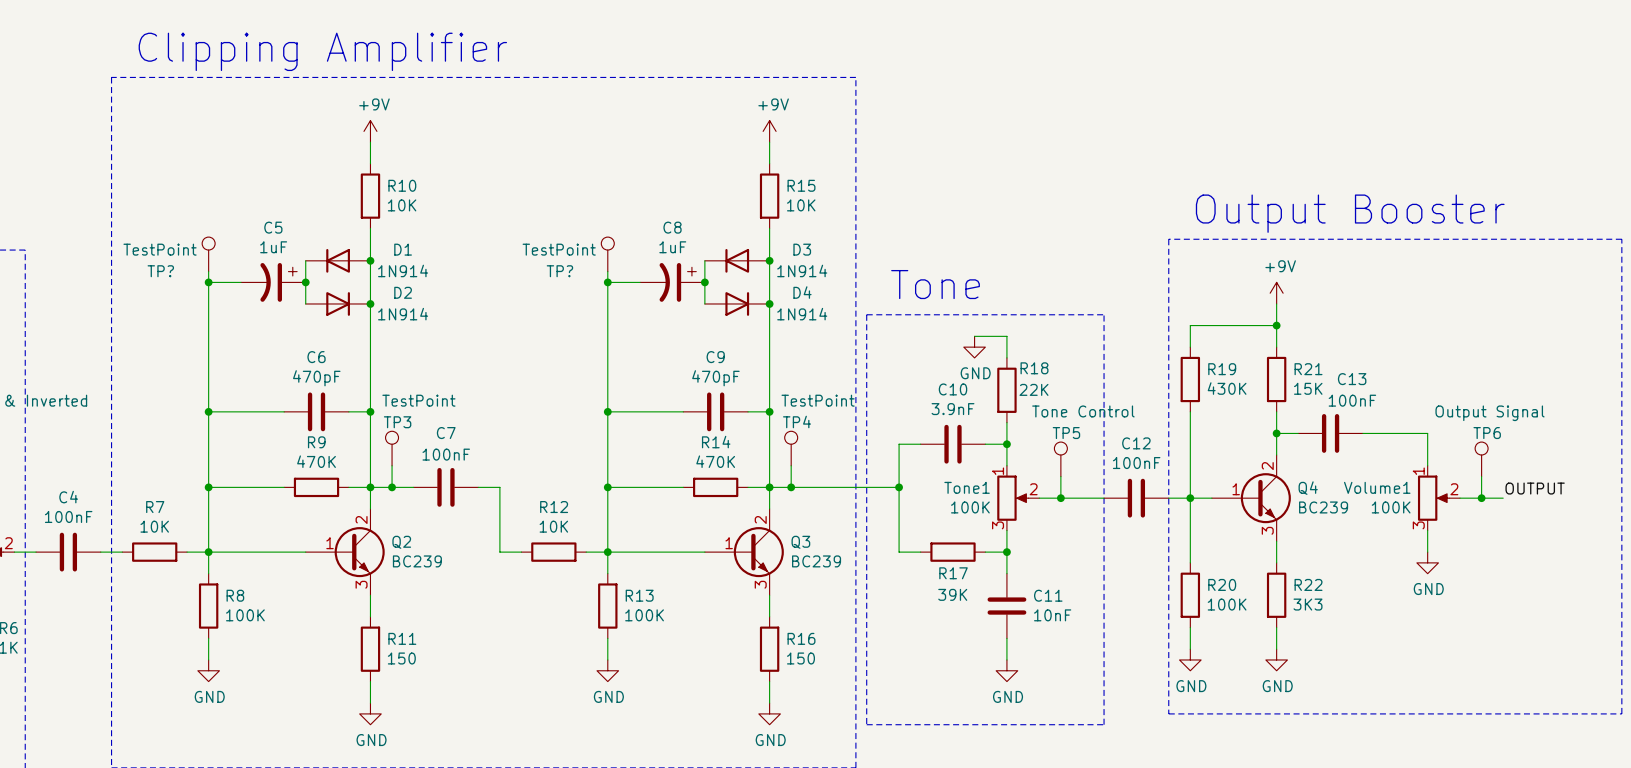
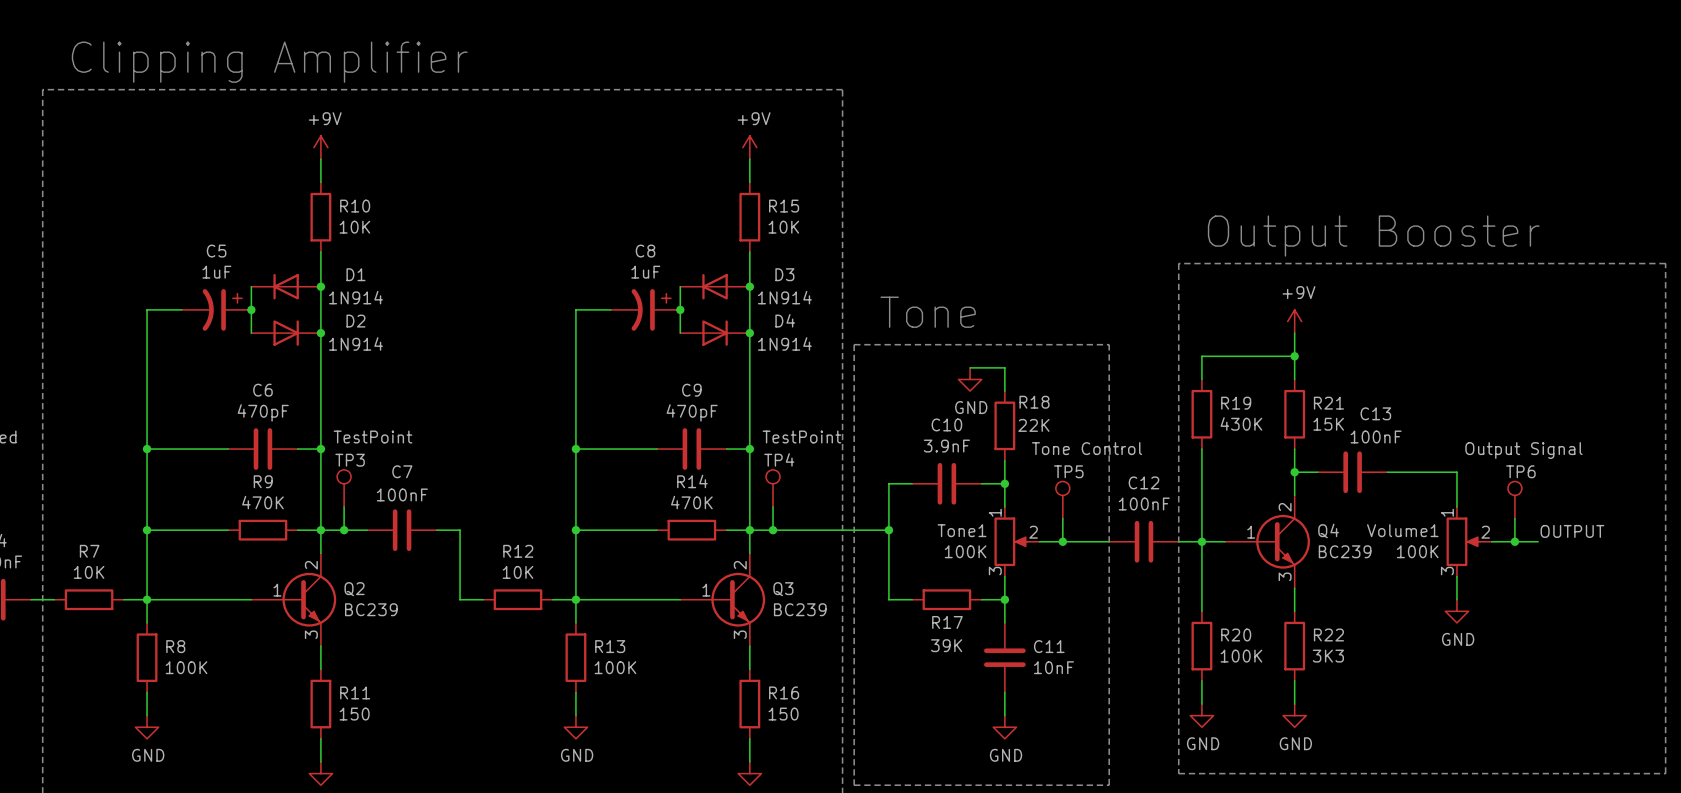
TP?: TestPoint (208, 254) -> none
TP?: TestPoint (607, 254) -> none
wire: (208, 271) (208, 282) -> none
wire: (607, 271) (607, 282) -> none
junction: (208, 282) -> none
junction: (607, 282) -> none

